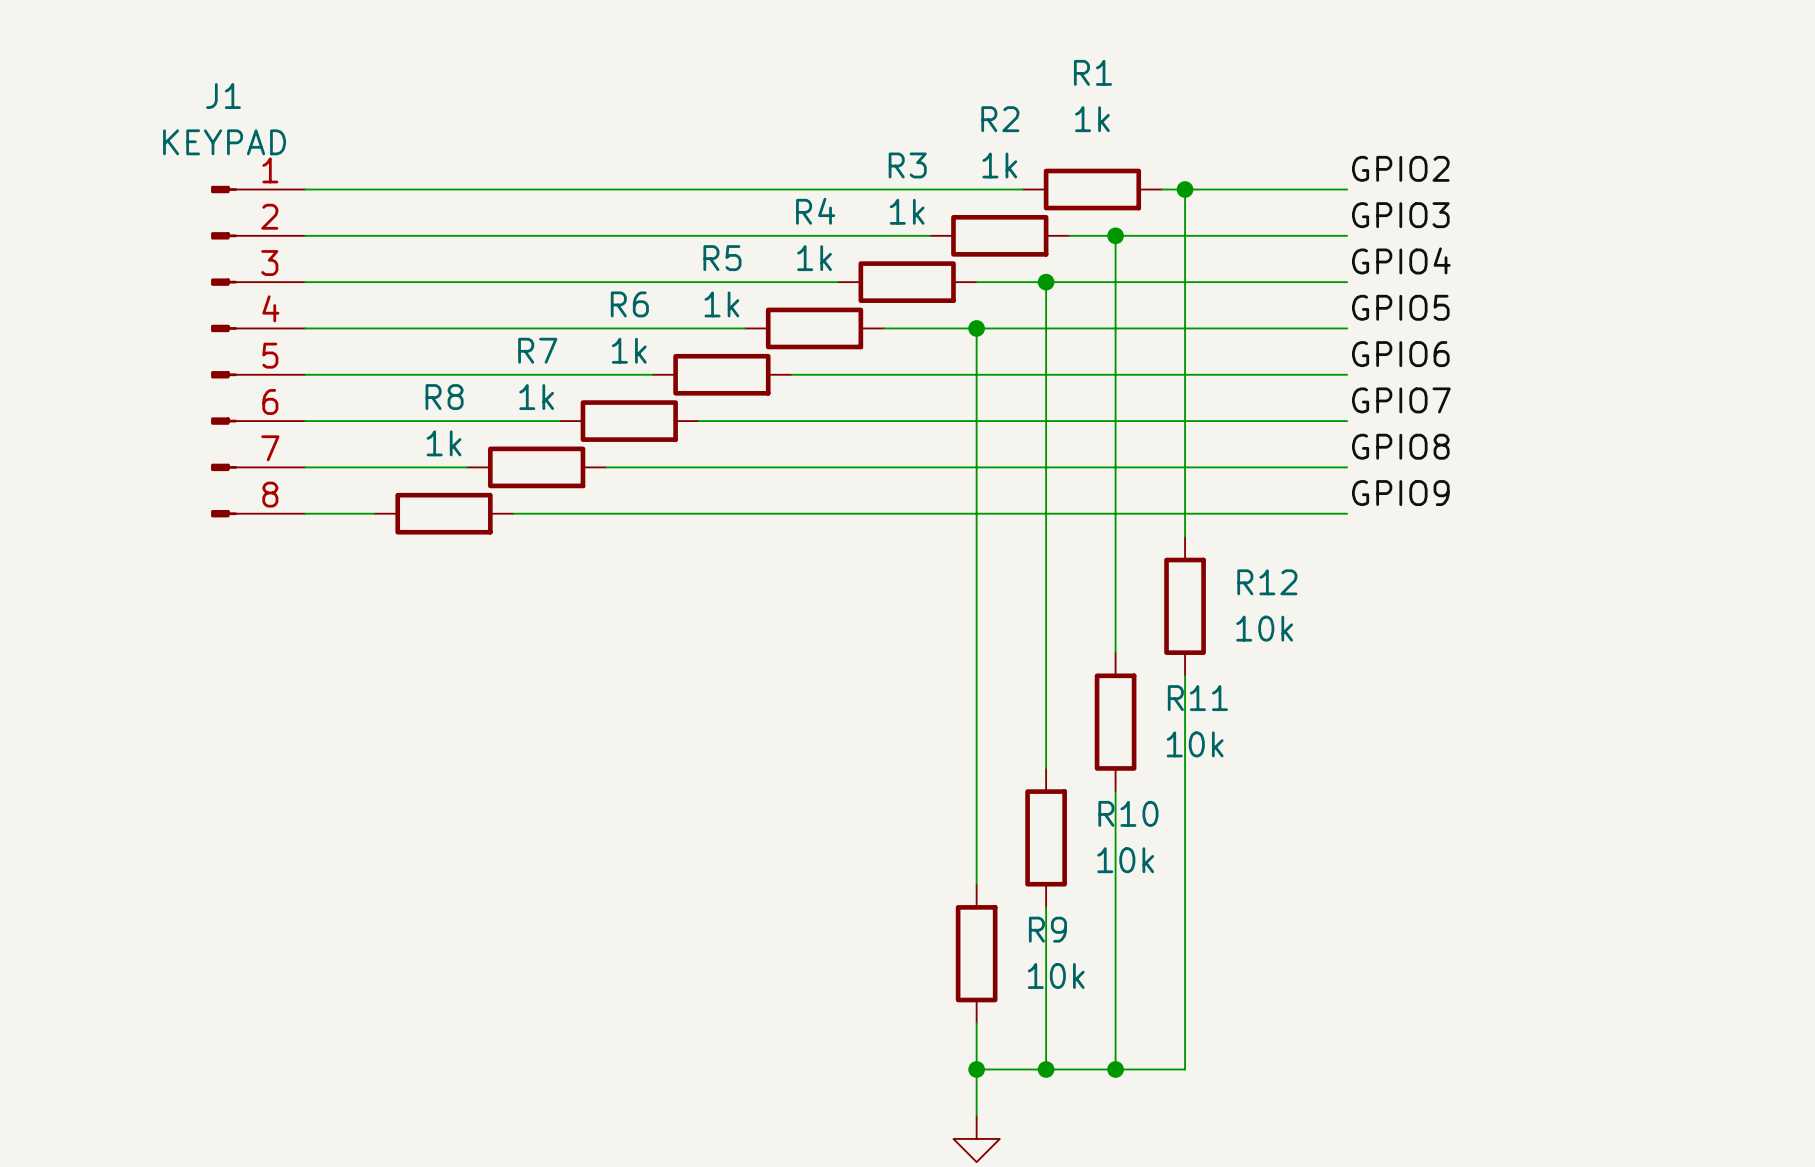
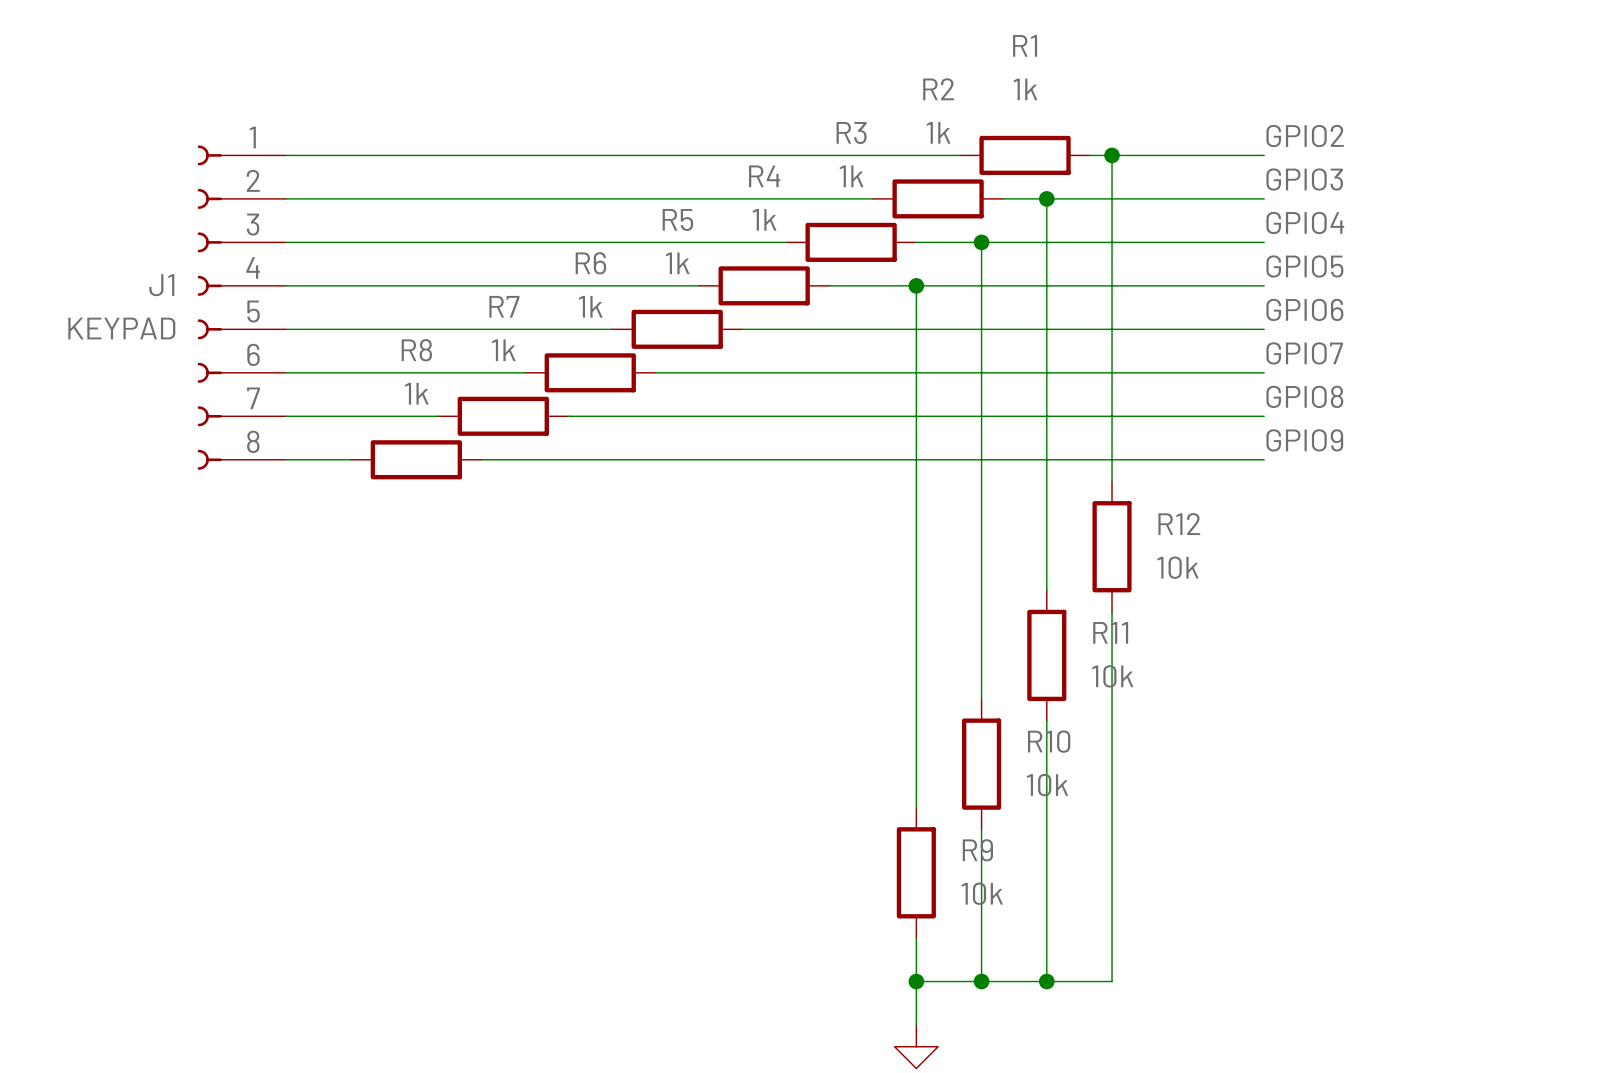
J1 name position: J1 (223, 96) -> J1 (161, 285)
J1 value position: KEYPAD (224, 142) -> KEYPAD (121, 328)
J1 symbol: [211, 185, 306, 518] -> [197, 145, 286, 470]

